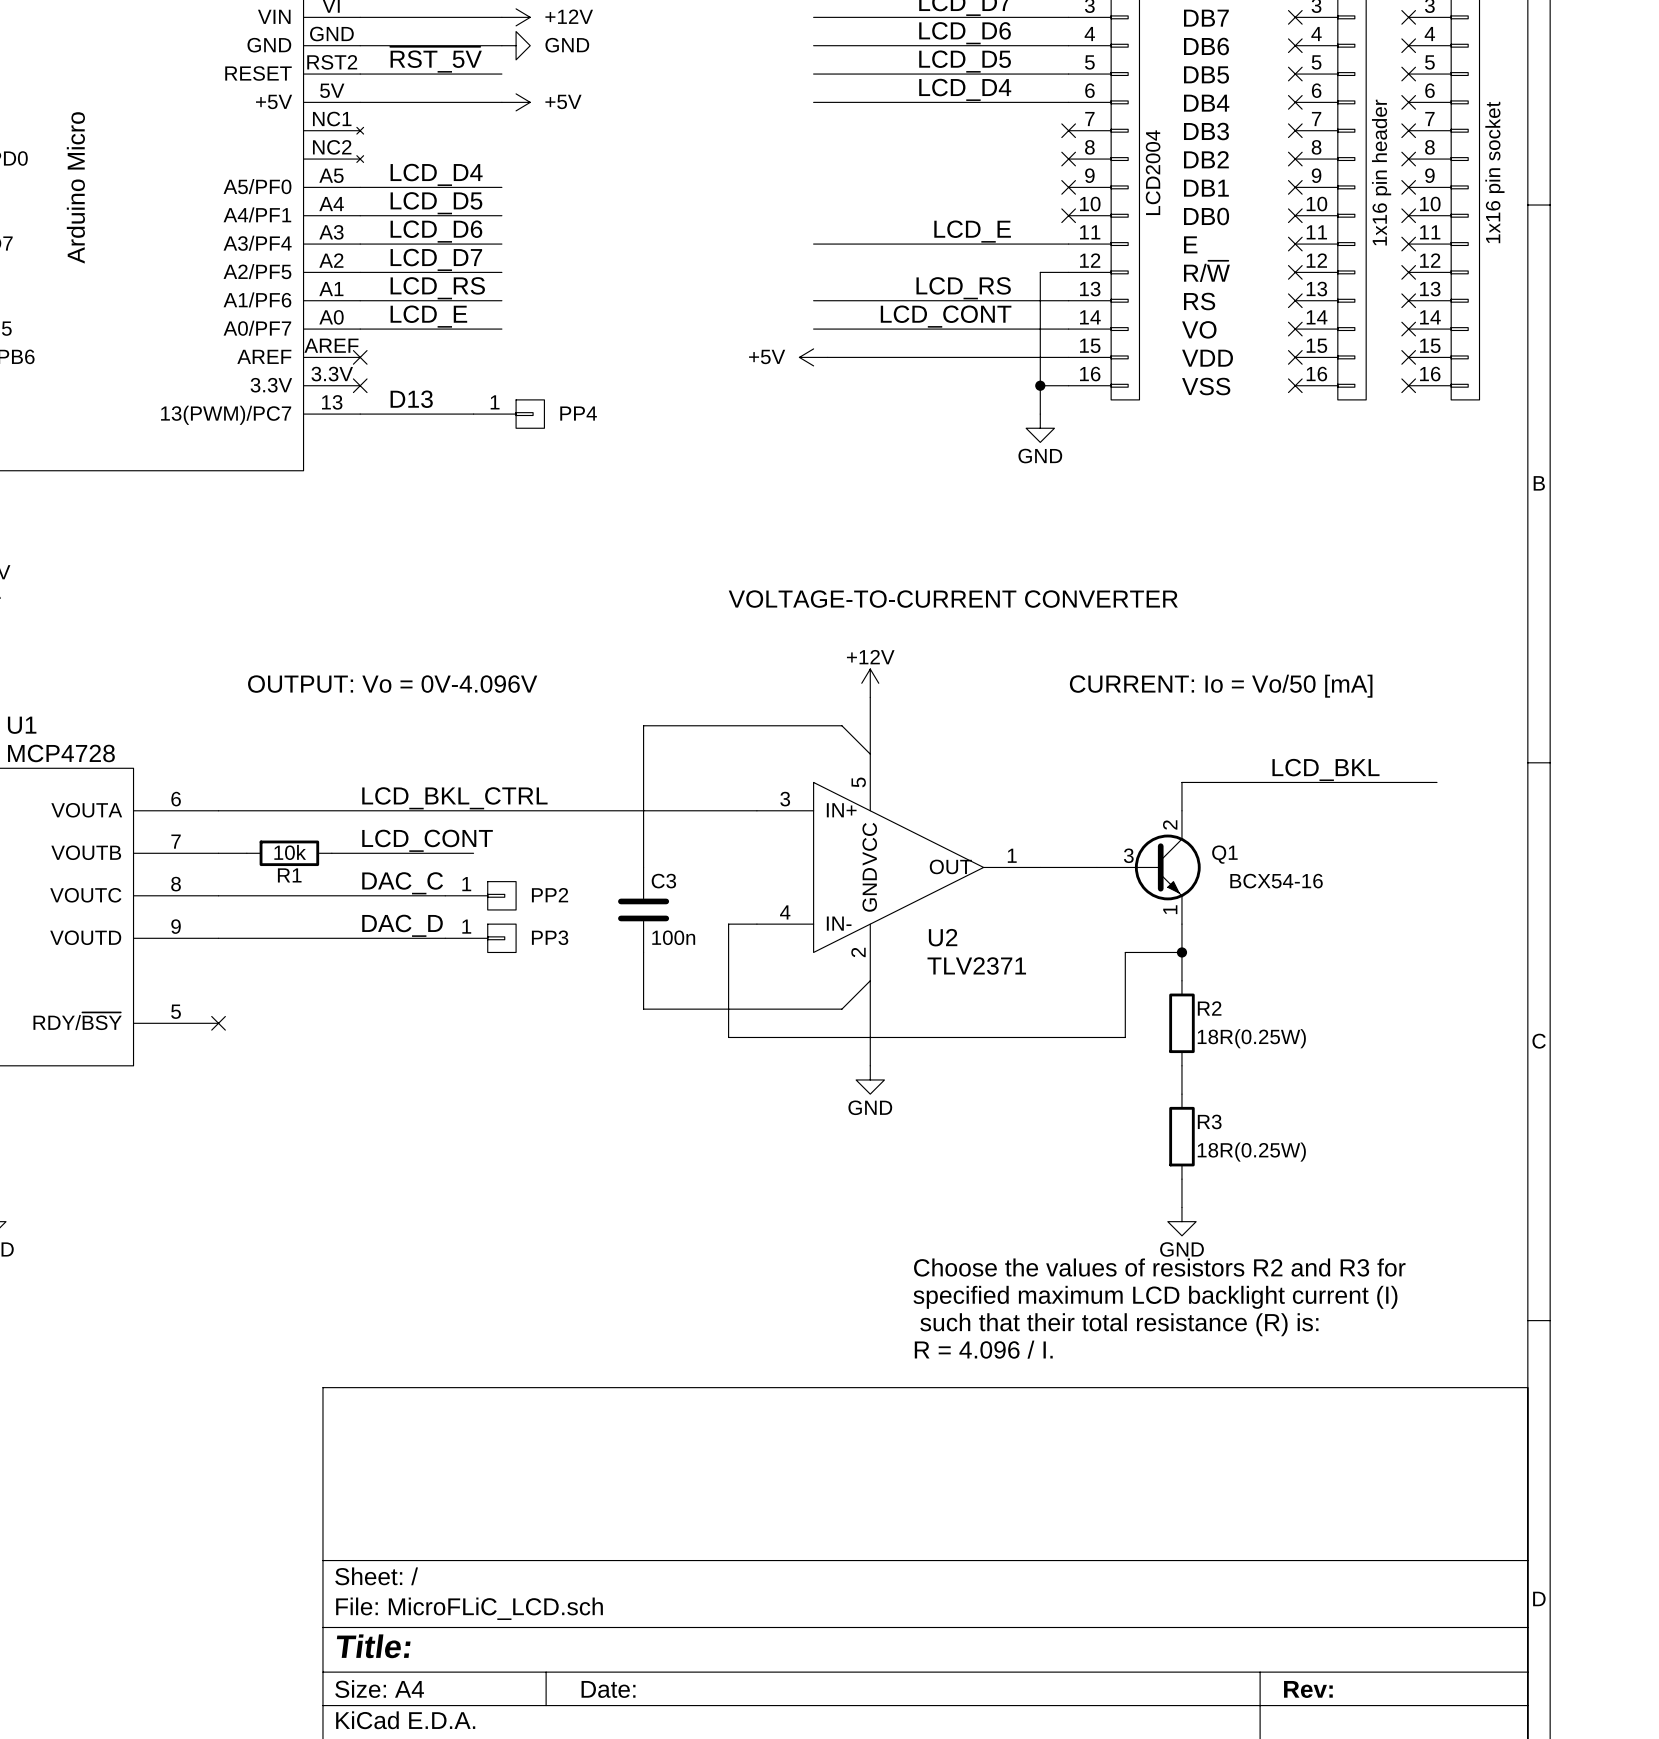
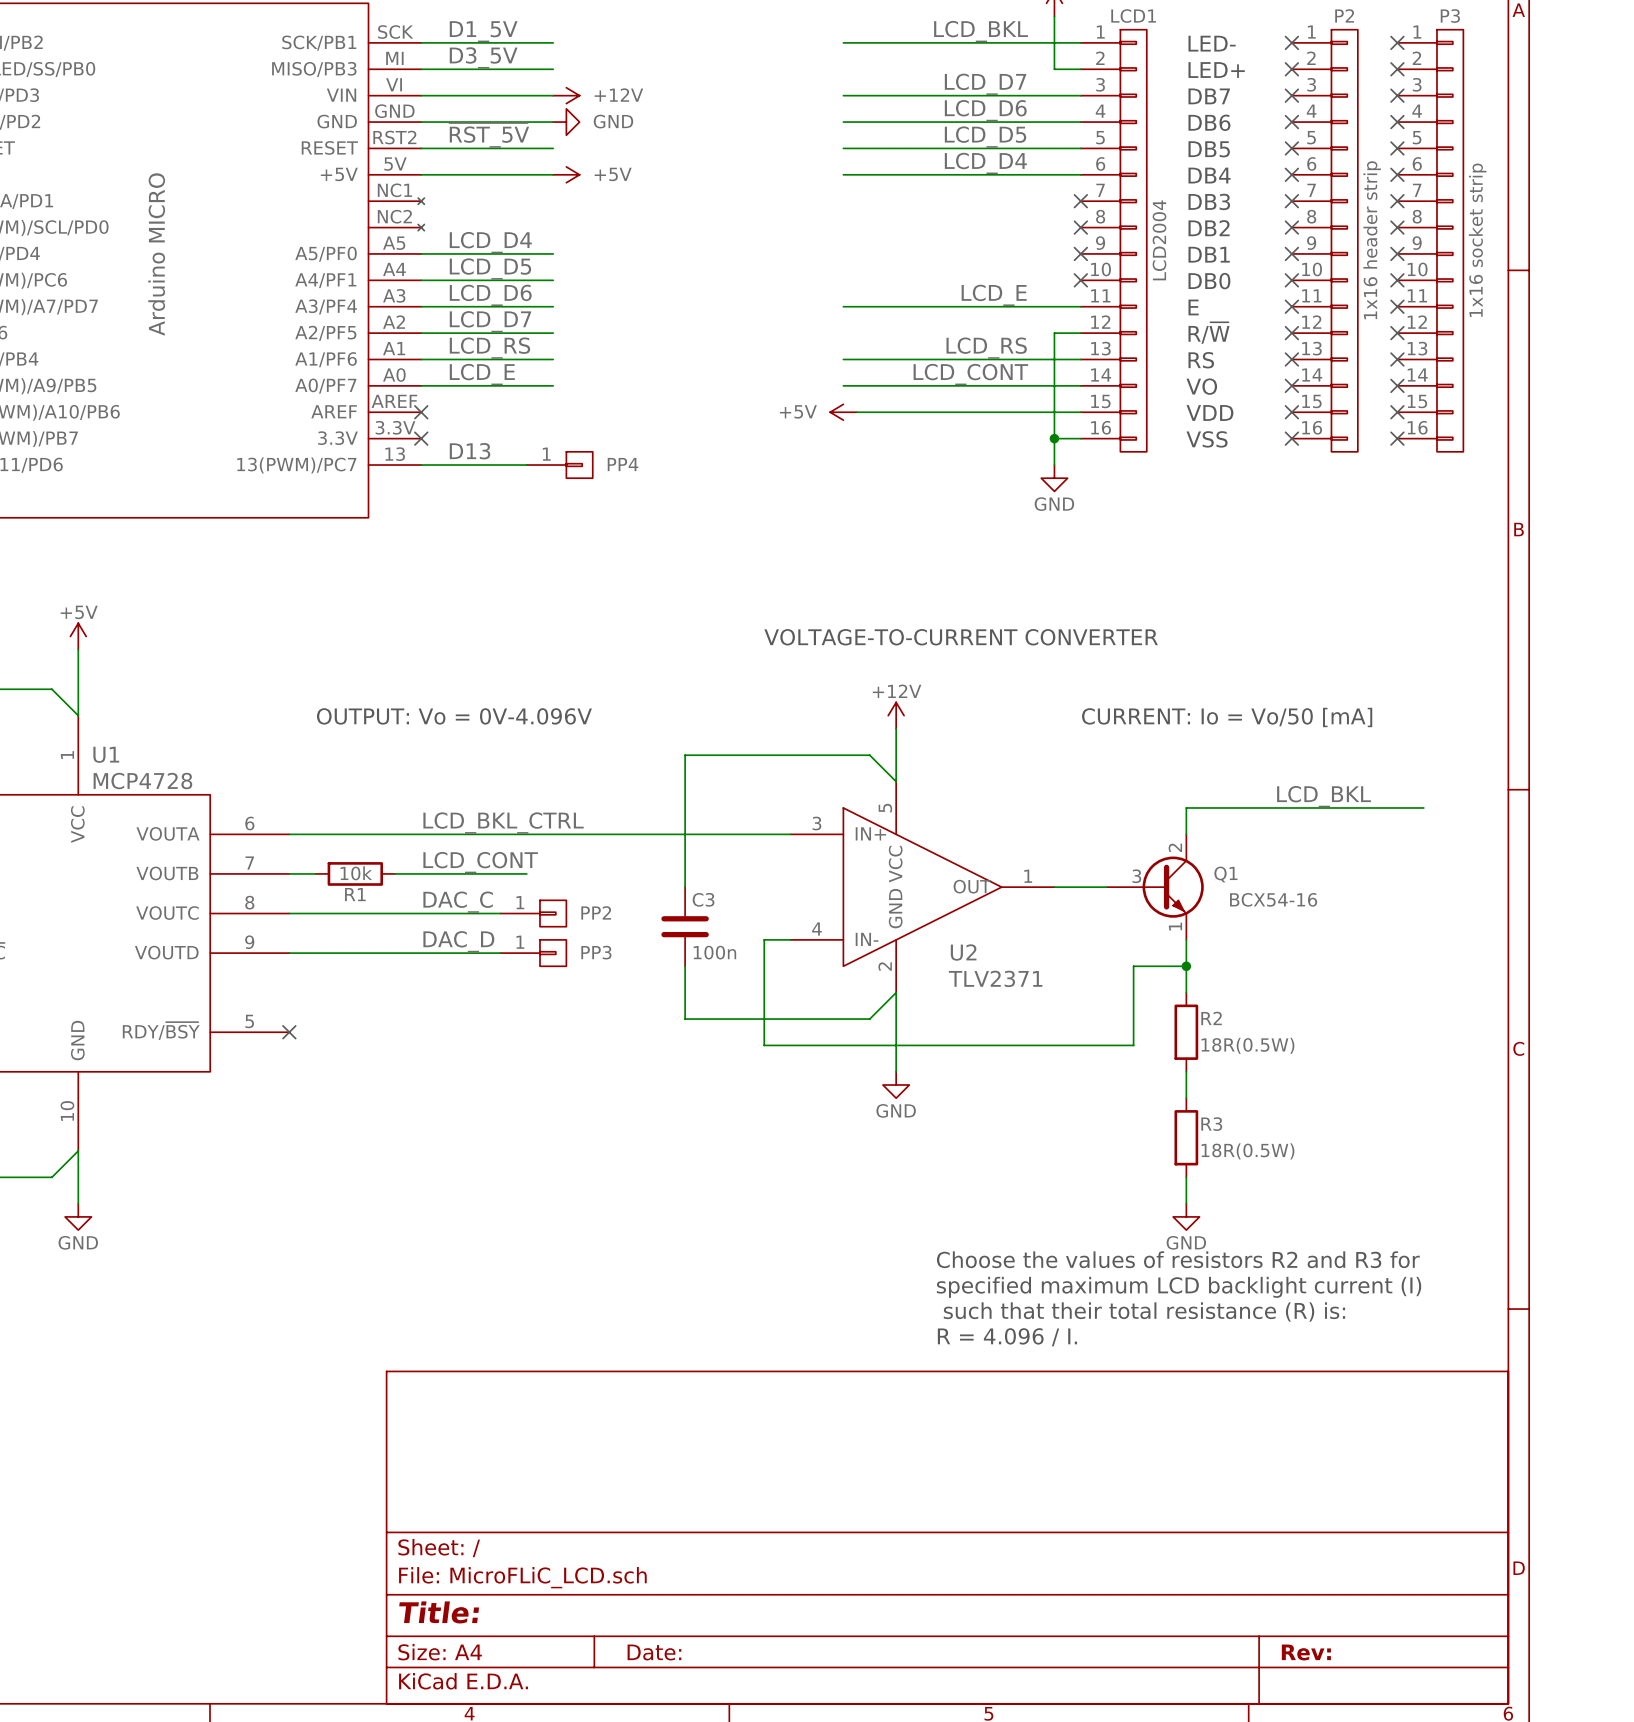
P2 value: 1x16 pin header (1381, 172) -> 1x16 header strip (1372, 240)
P3 value: 1x16 pin socket (1494, 172) -> 1x16 socket strip (1477, 240)
part value: Arduino Micro (75, 187) -> Arduino MICRO (156, 254)
R2 value: 18R(0.25W) (1251, 1038) -> 18R(0.5W) (1247, 1045)
R3 value: 18R(0.25W) (1251, 1152) -> 18R(0.5W) (1247, 1151)

